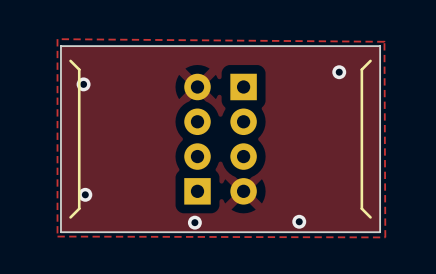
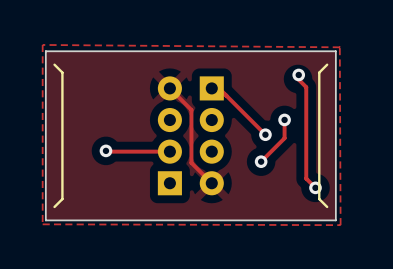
track: none -> (298, 79) (306, 87) (306, 178) (315, 187)
via: (83, 84) -> none
track: none -> (169, 88) (191, 109) (191, 162) (211, 183)
track: none -> (211, 88) (219, 88) (265, 134)
track: none -> (284, 119) (284, 138) (261, 161)
via: none -> (284, 119)
via: none -> (265, 134)
track: none -> (105, 150) (169, 151)
via: none -> (105, 150)
via: none -> (261, 161)
via: (85, 194) -> none
via: none -> (315, 187)
via: (299, 221) -> none
via: (194, 222) -> none

